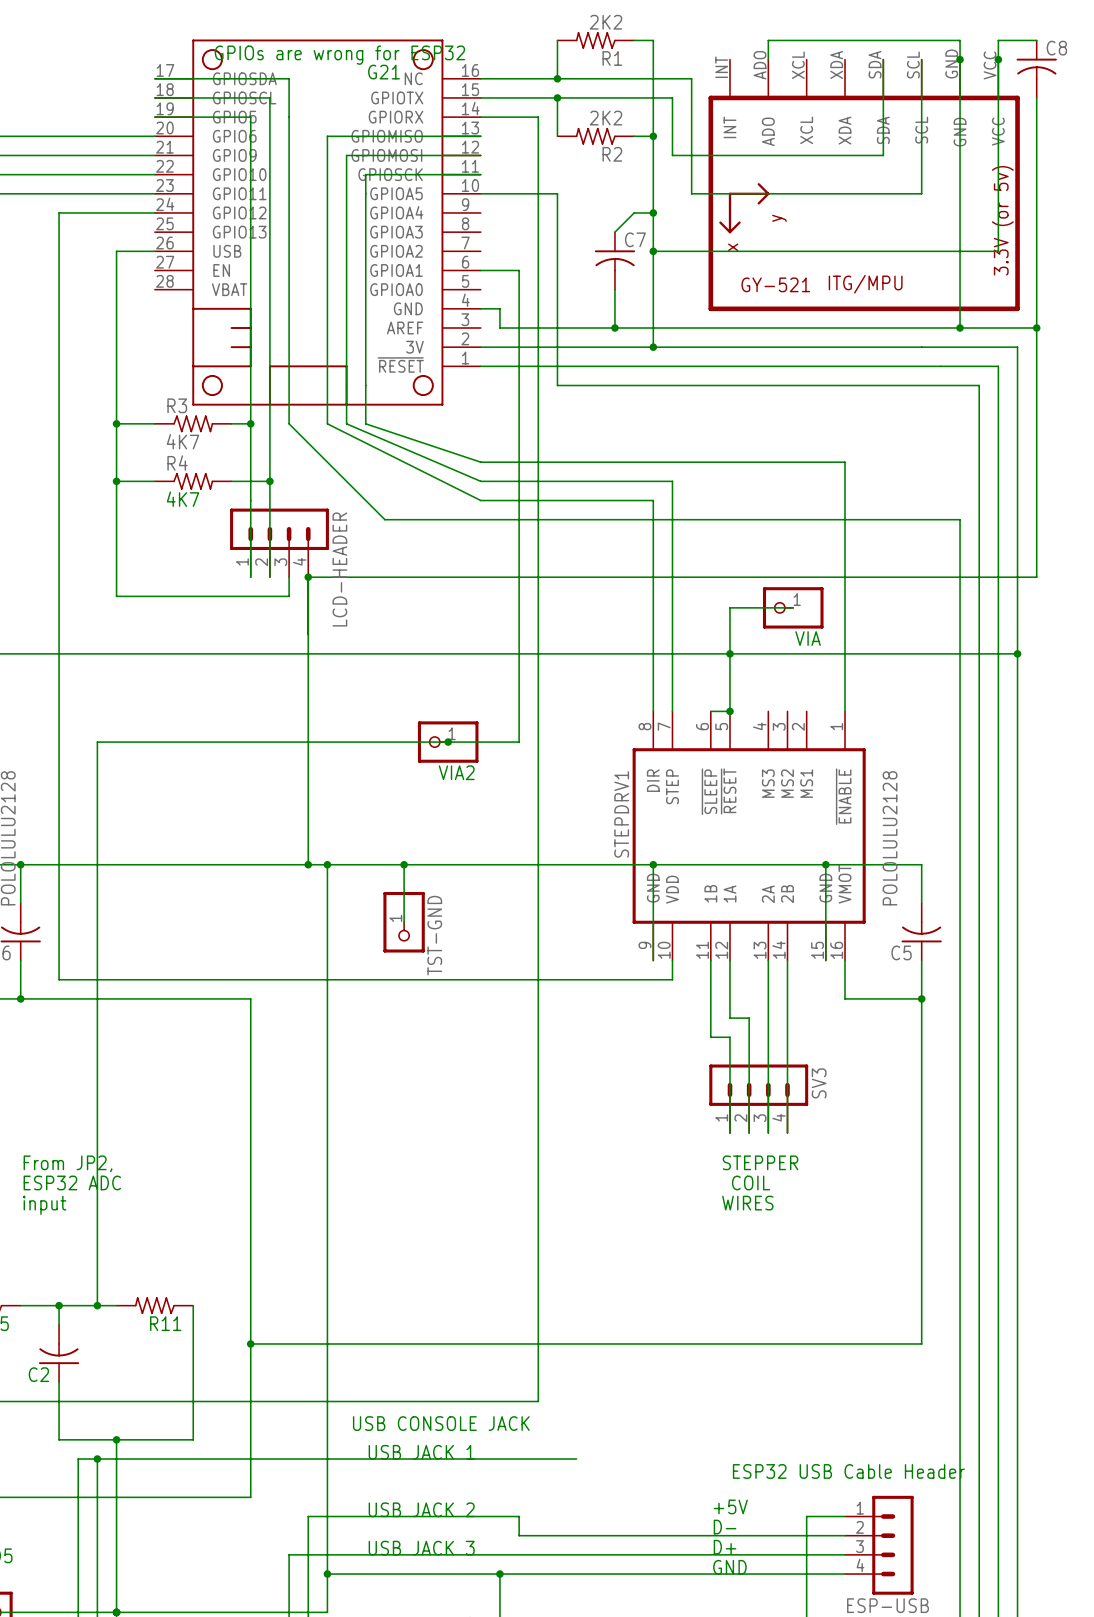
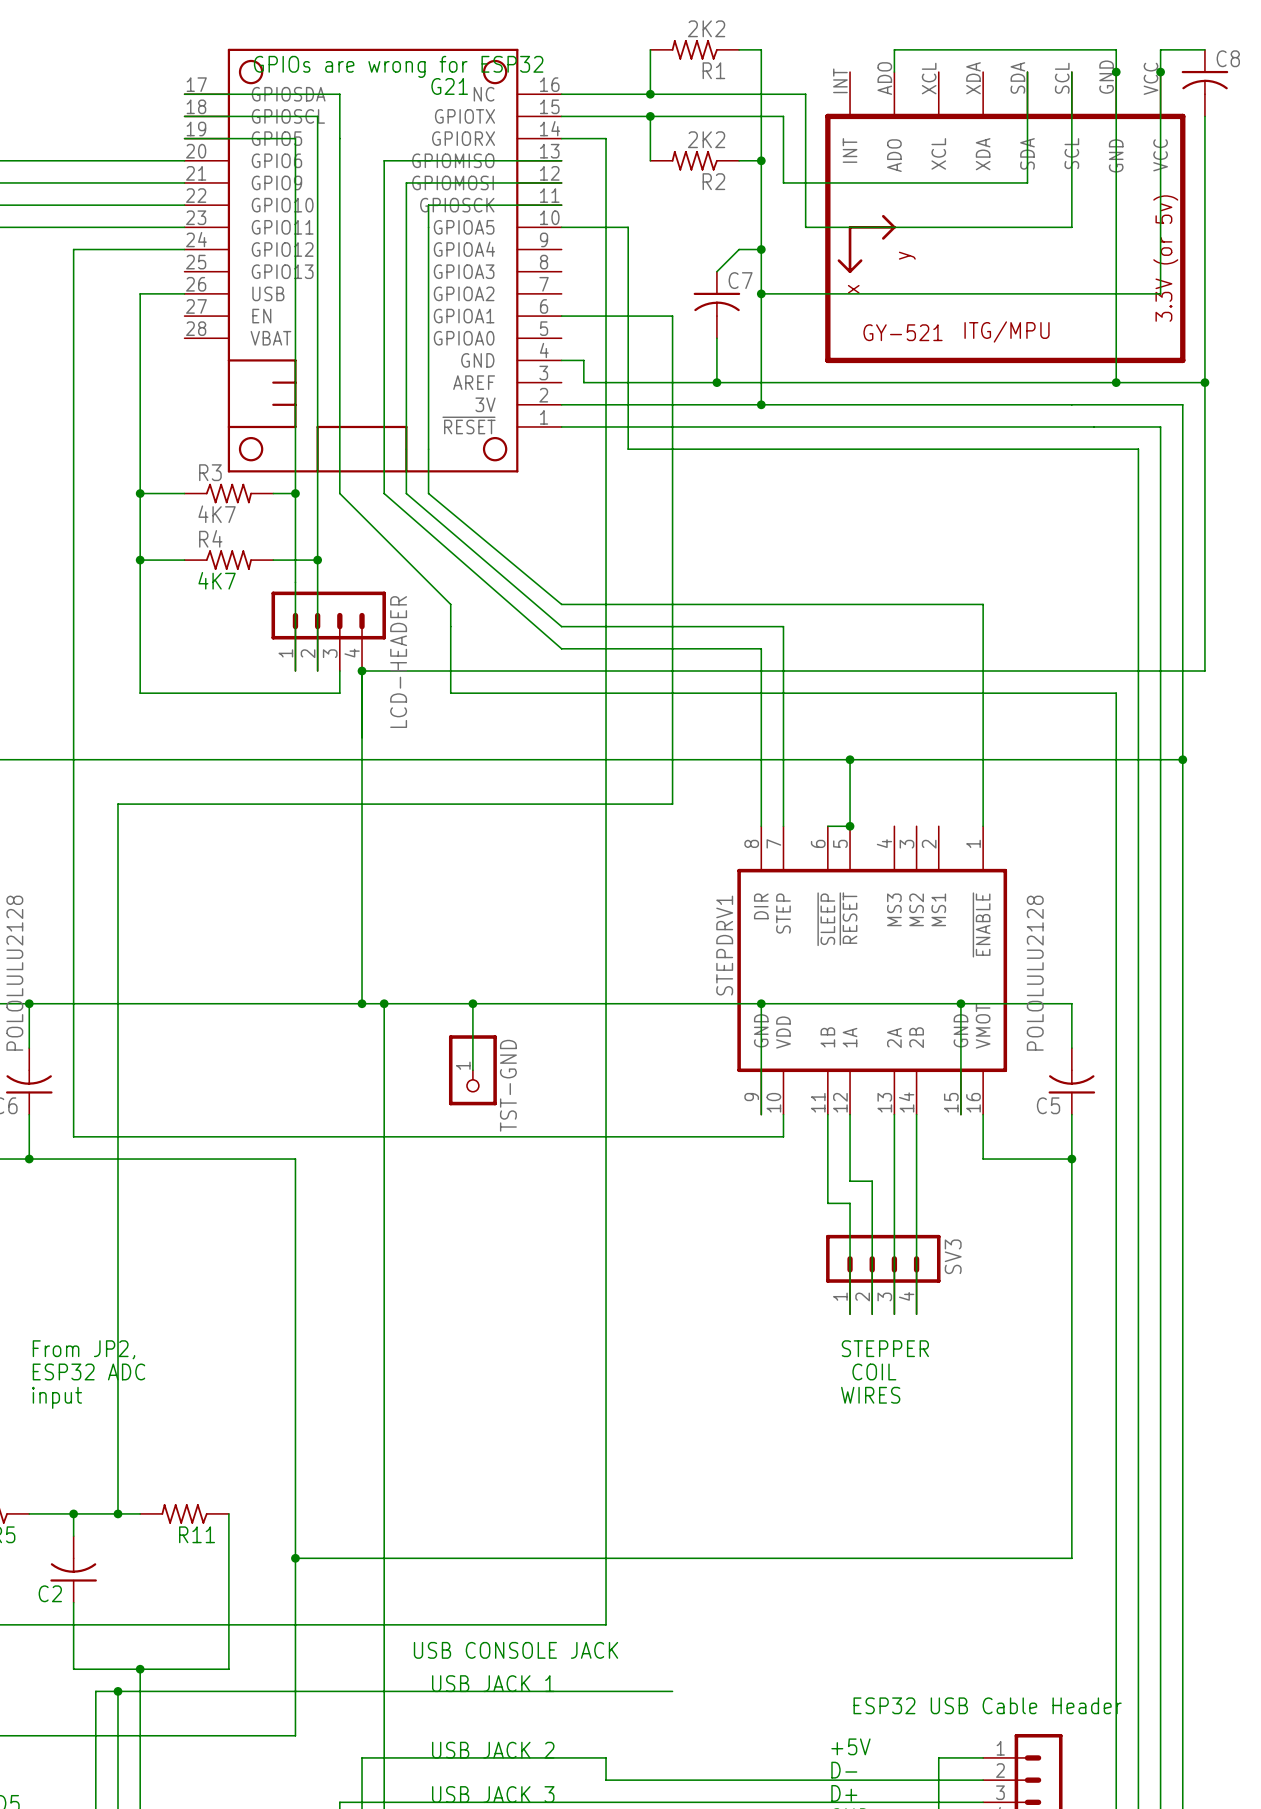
wire: (519, 117) (538, 117) (538, 193) (557, 193) (557, 385) -> (628, 449) (650, 449)
wire: (538, 385) (538, 1401) (519, 1401) -> (606, 861) (606, 1624)
wire: (327, 423) (480, 500) (653, 500) (653, 558) -> (384, 493) (561, 648) (761, 648)
wire: (346, 423) (480, 481) (672, 481) (672, 538) -> (406, 493) (561, 626) (783, 626)
wire: (365, 423) (480, 462) (845, 462) (845, 519) (960, 519) (960, 596) -> (450, 604) (450, 693) (1116, 693)
wire: (384, 519) (480, 519) -> (428, 493) (561, 604)
wire: (793, 607) (729, 607) (729, 653) -> none
VIA: (793, 607) -> none
wire: (97, 742) (519, 742) -> (118, 861) (118, 804) (672, 804) (672, 316) (606, 316) (606, 138)
VIA2: (448, 742) -> none
junction: (448, 742) -> none

